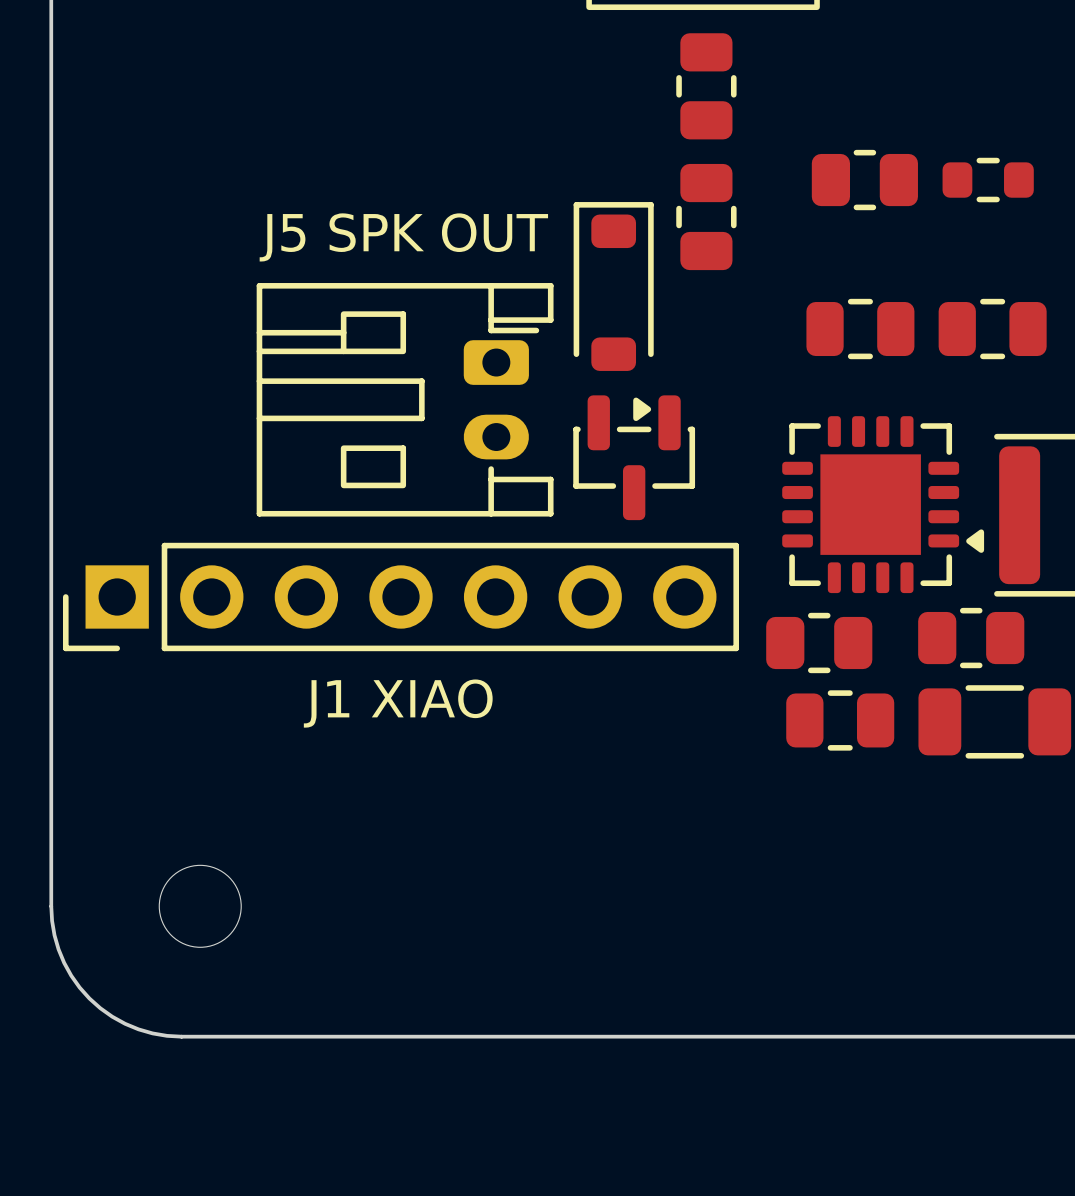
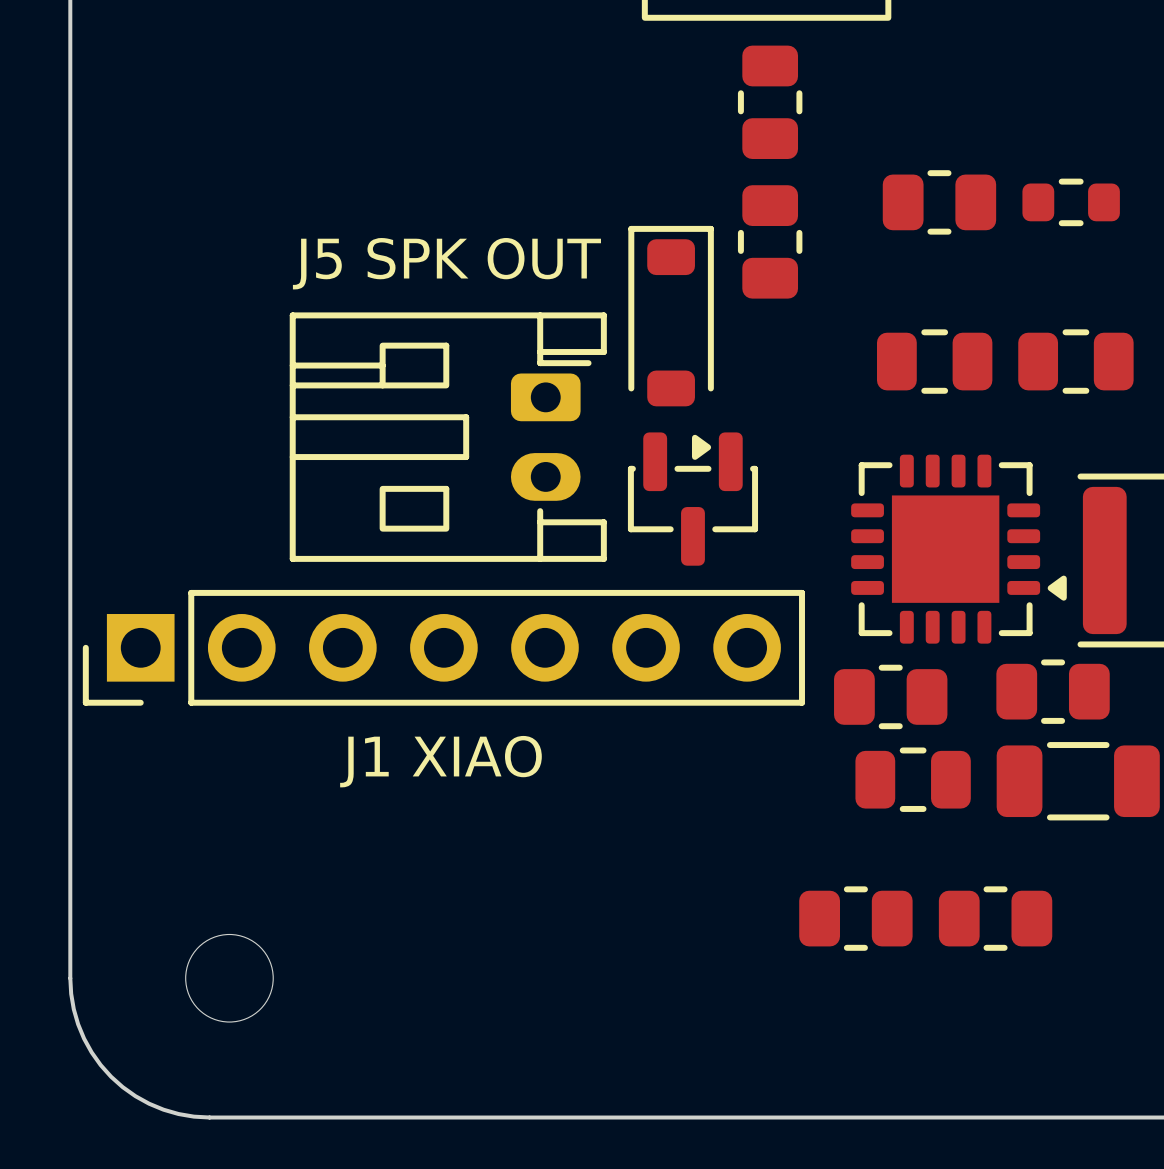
part: none -> (855, 918)
part: none -> (995, 918)

